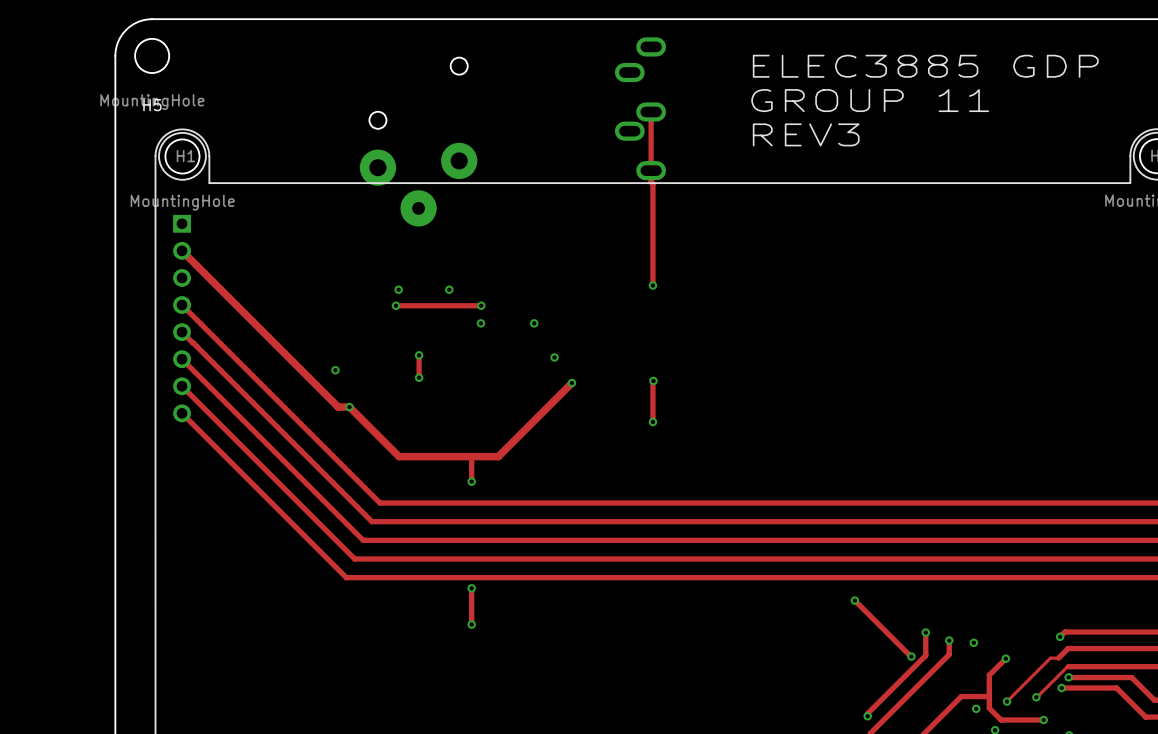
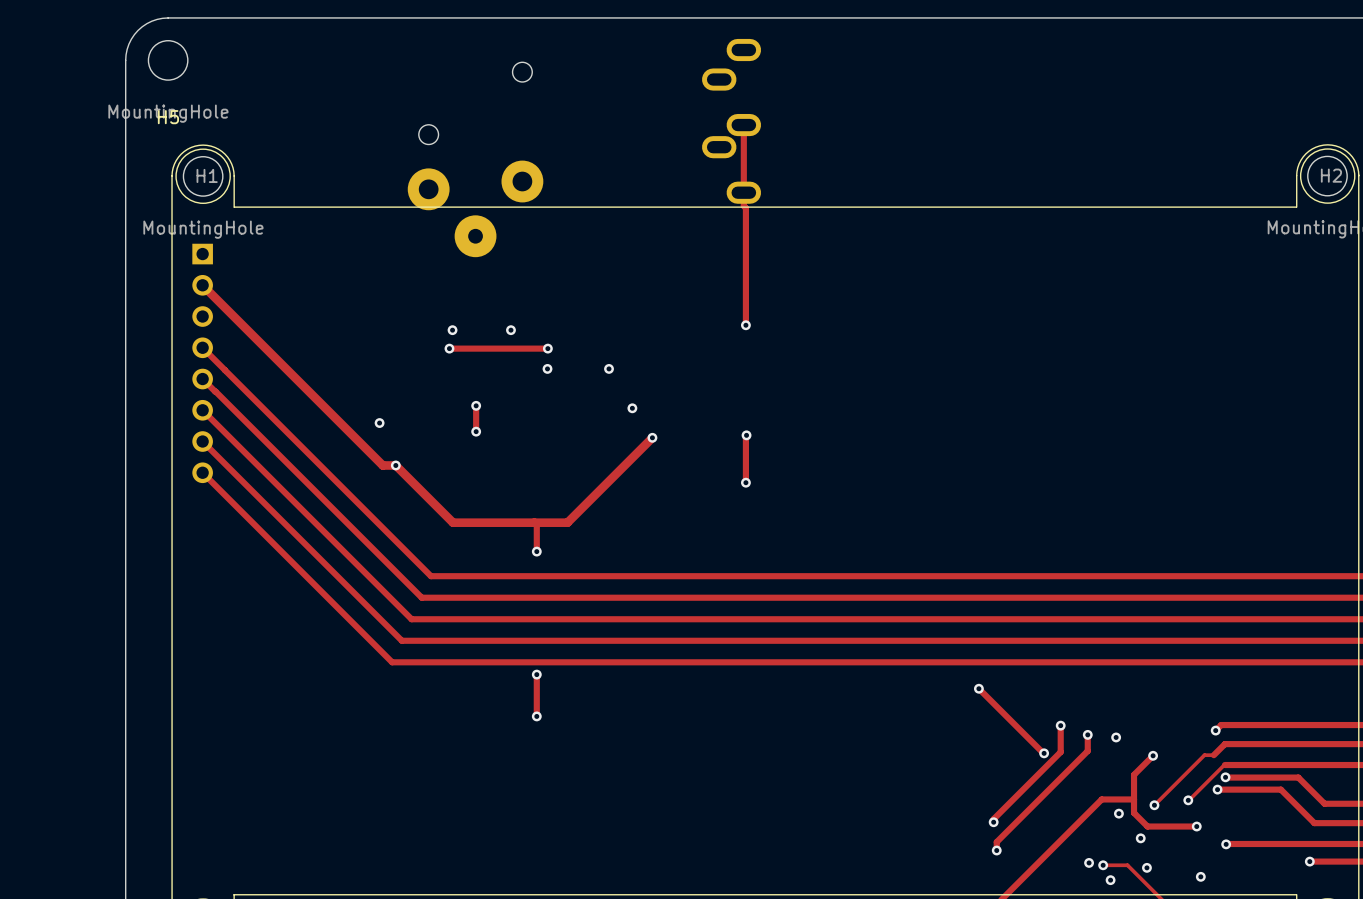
text: ELEC3885 GDP (925, 66) -> none
text: GROUP 11 (870, 100) -> none
text: REV3 (806, 134) -> none

